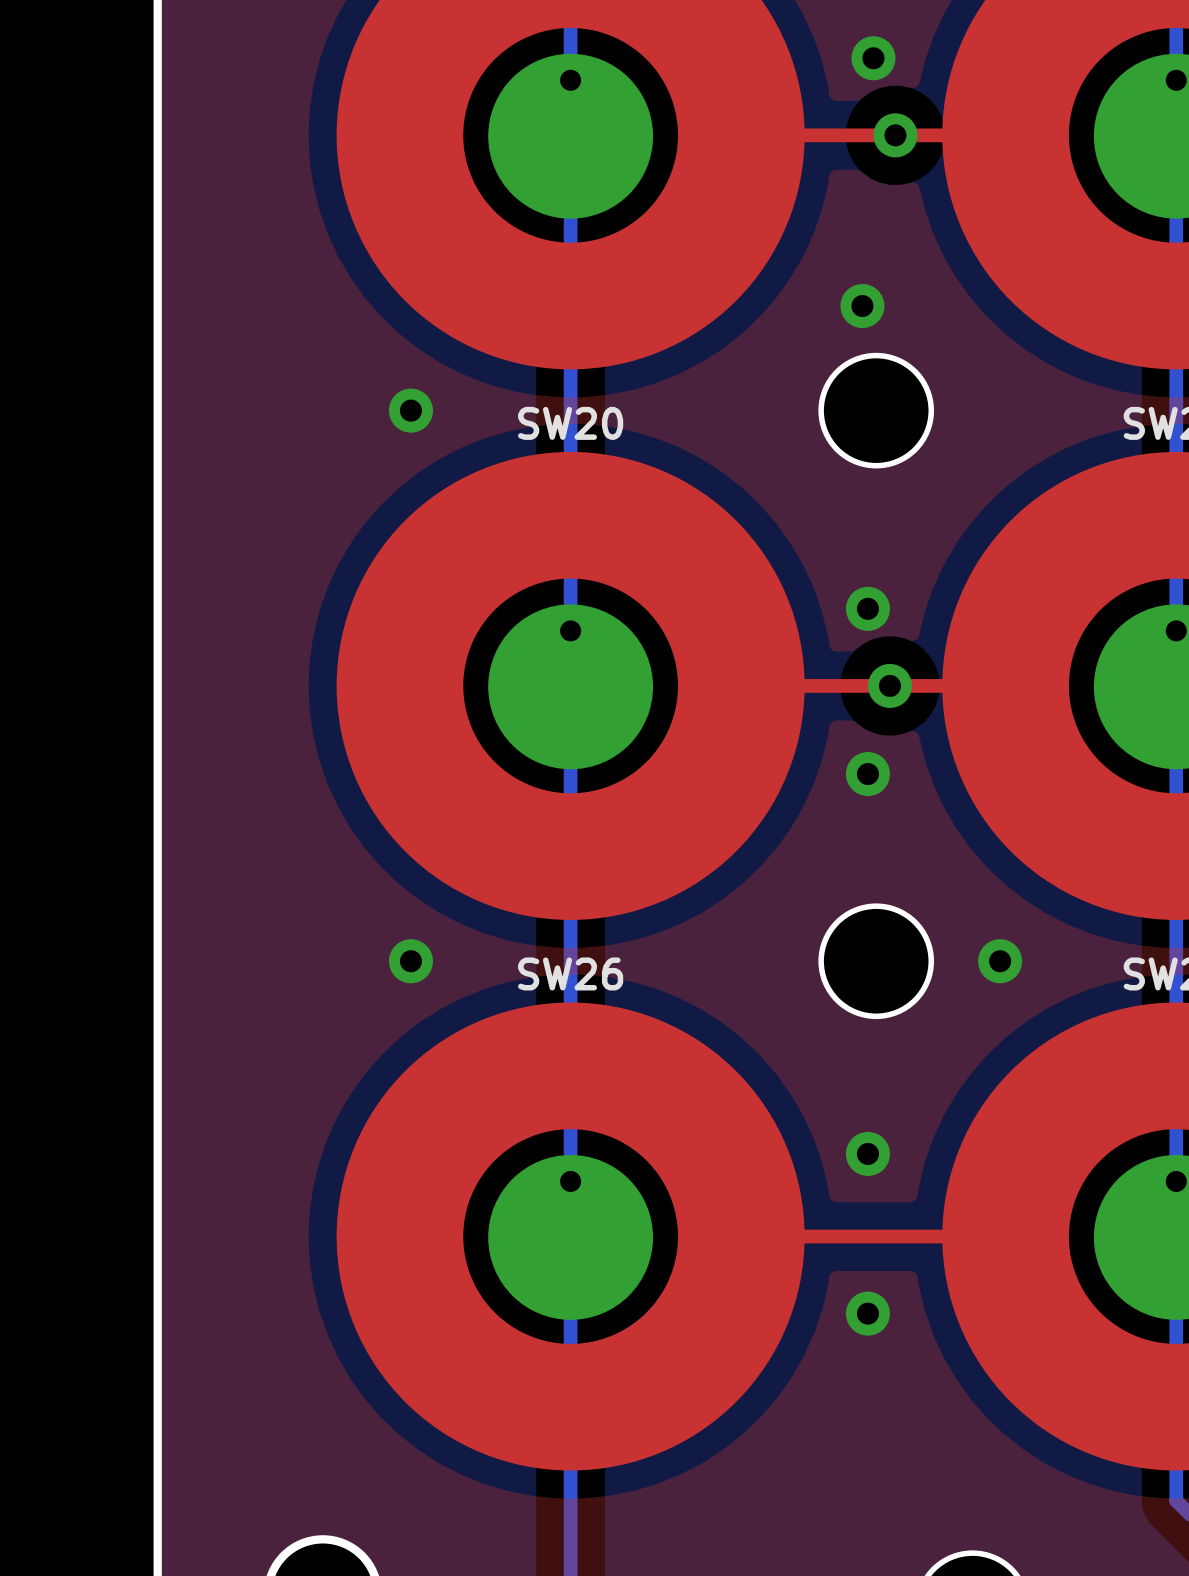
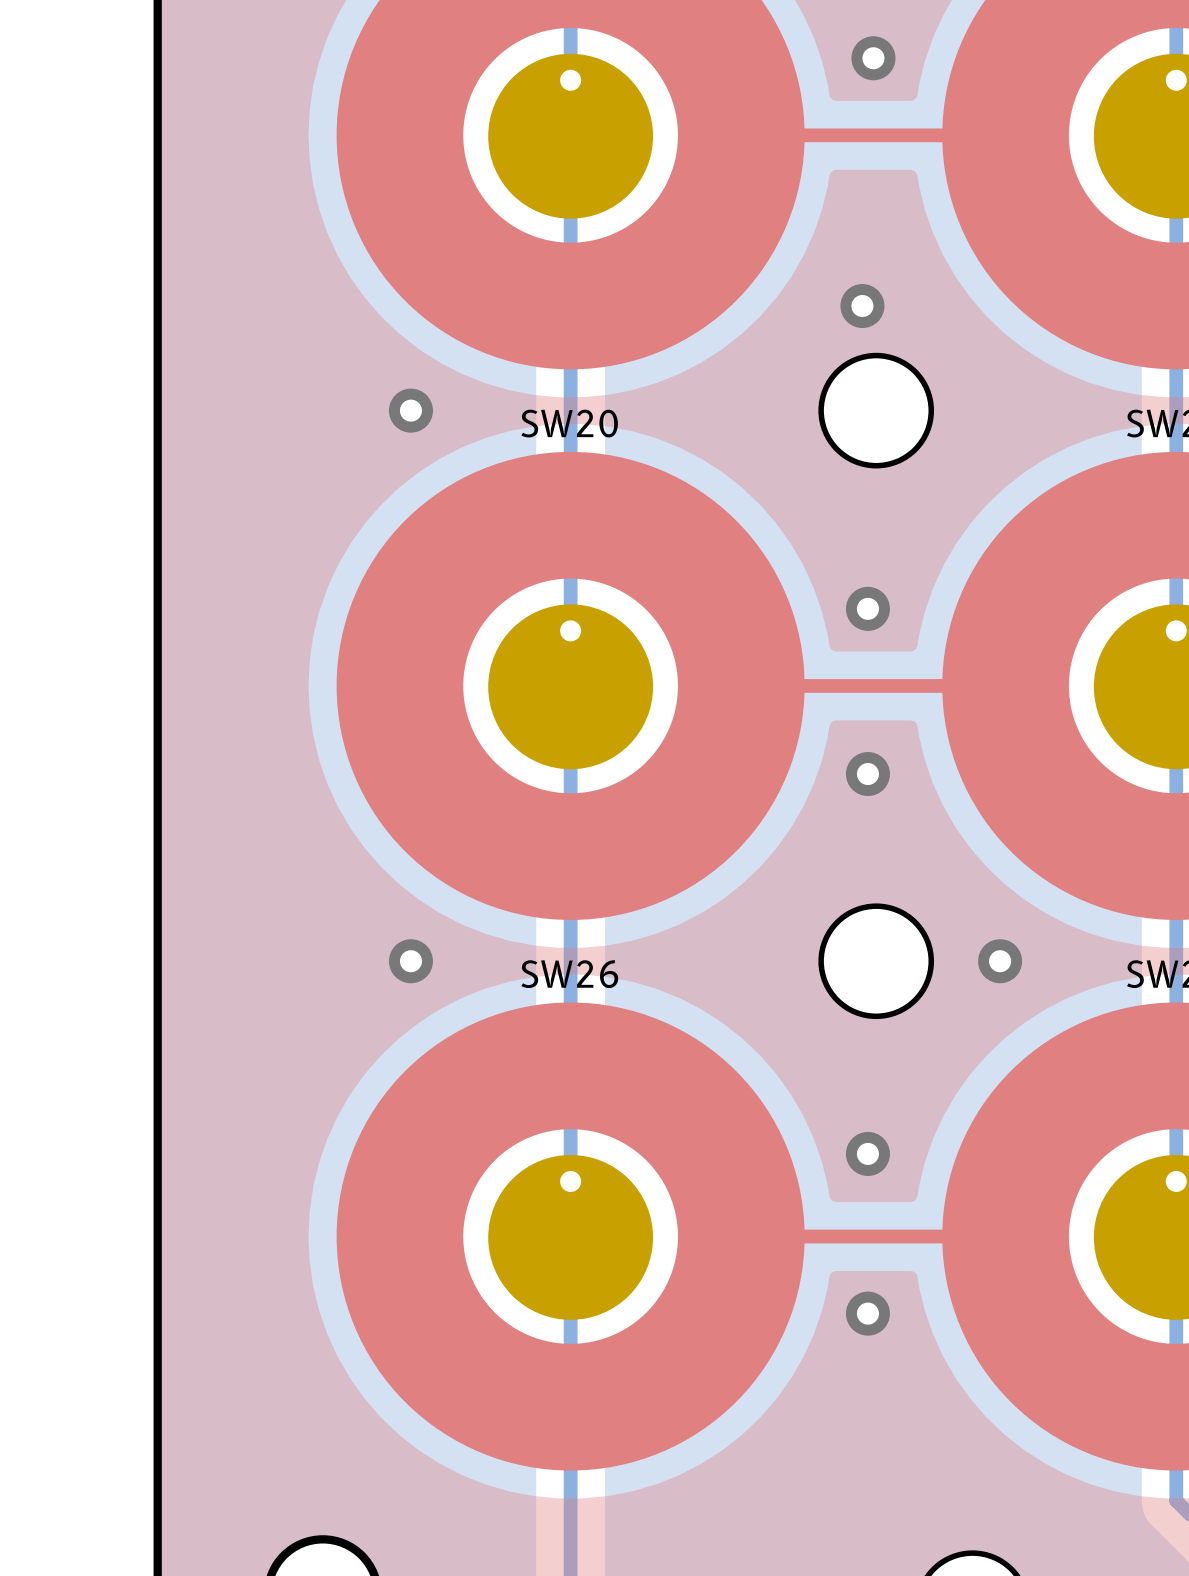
via: (895, 135) -> none
via: (889, 685) -> none

